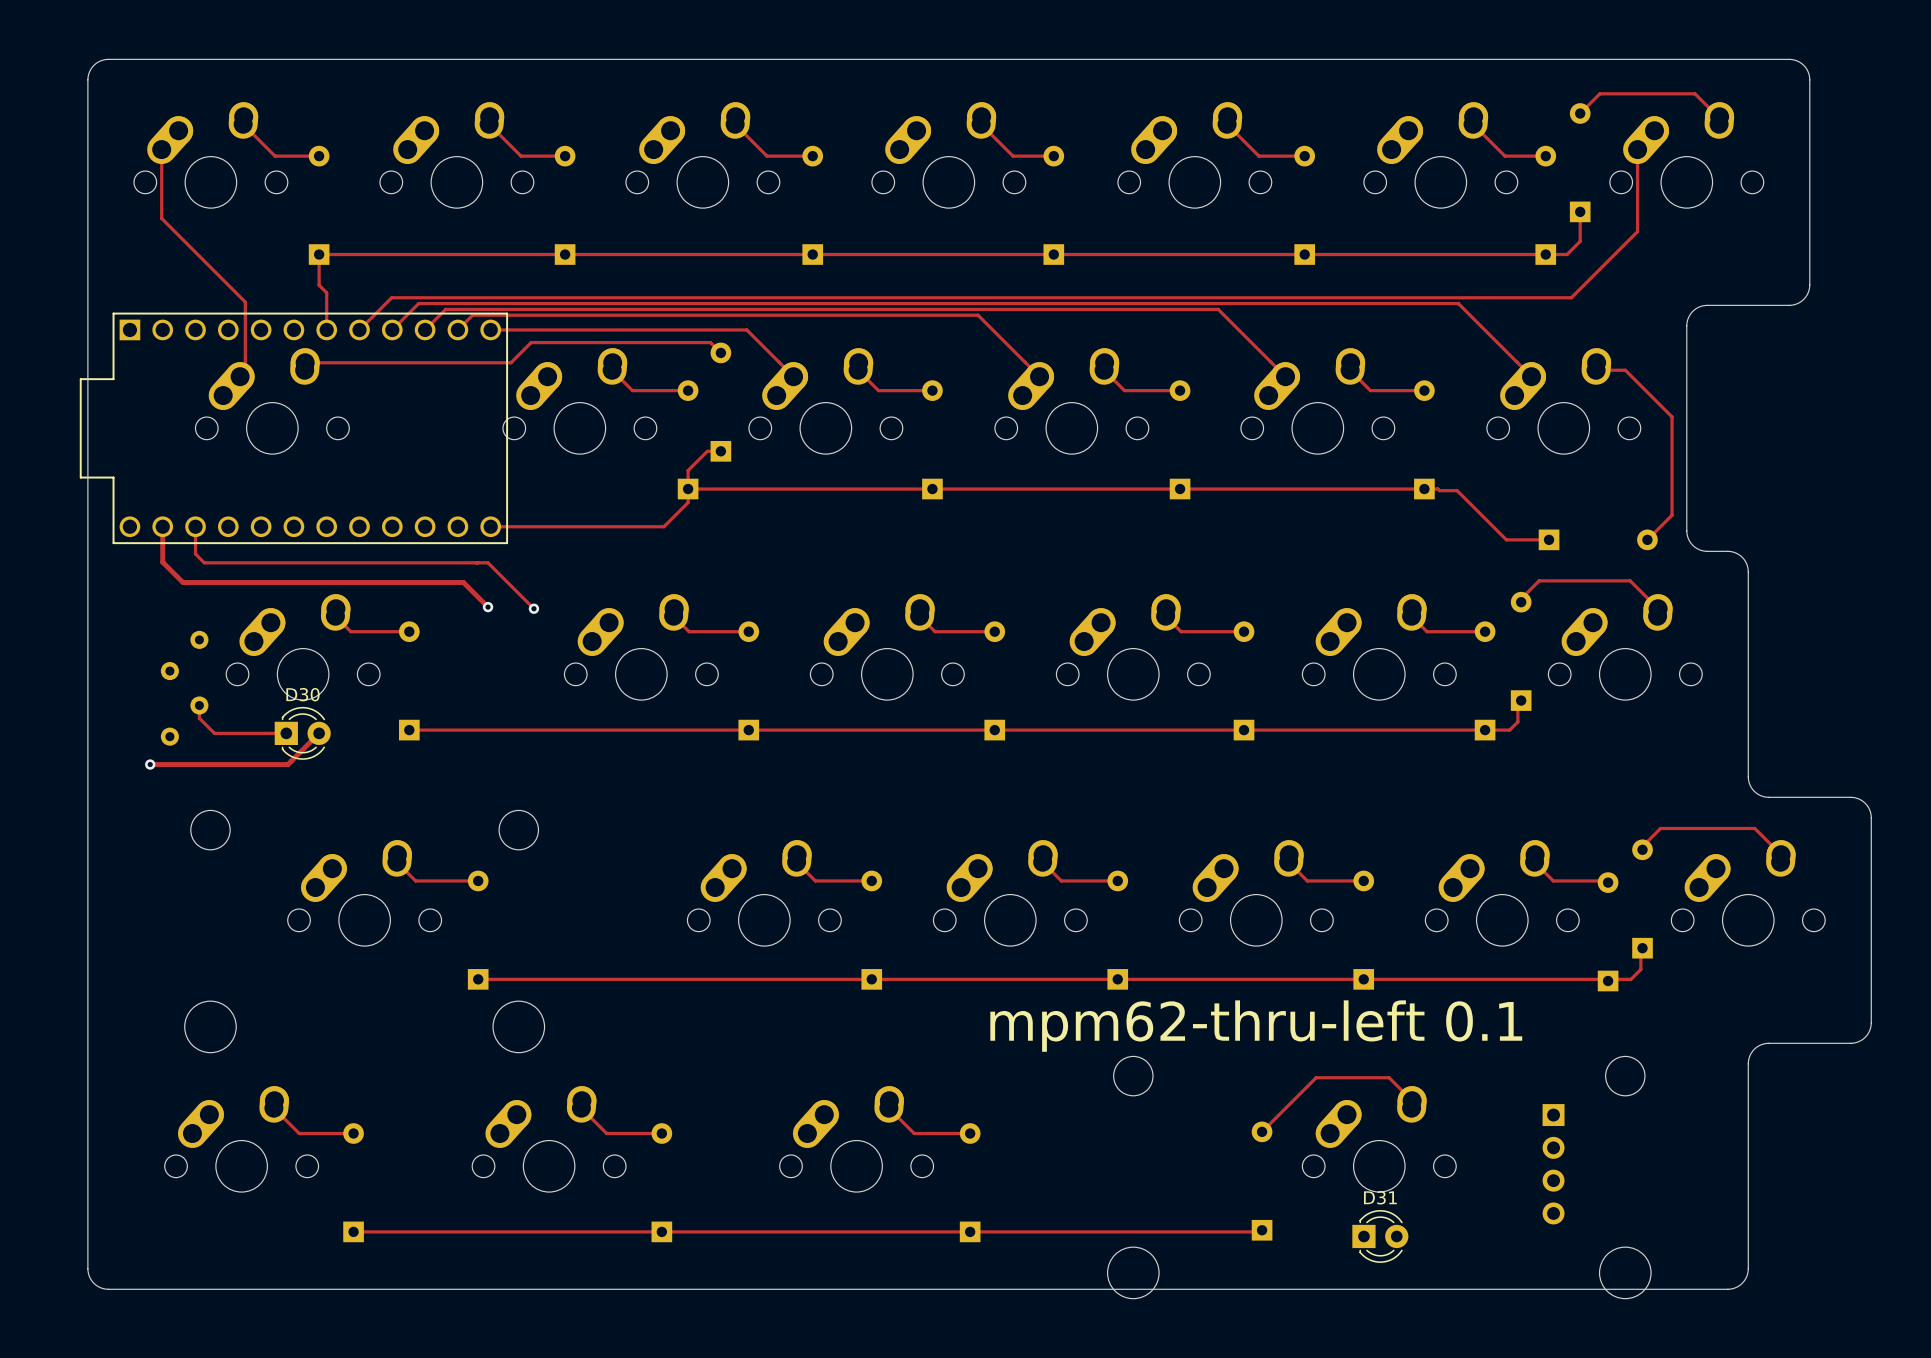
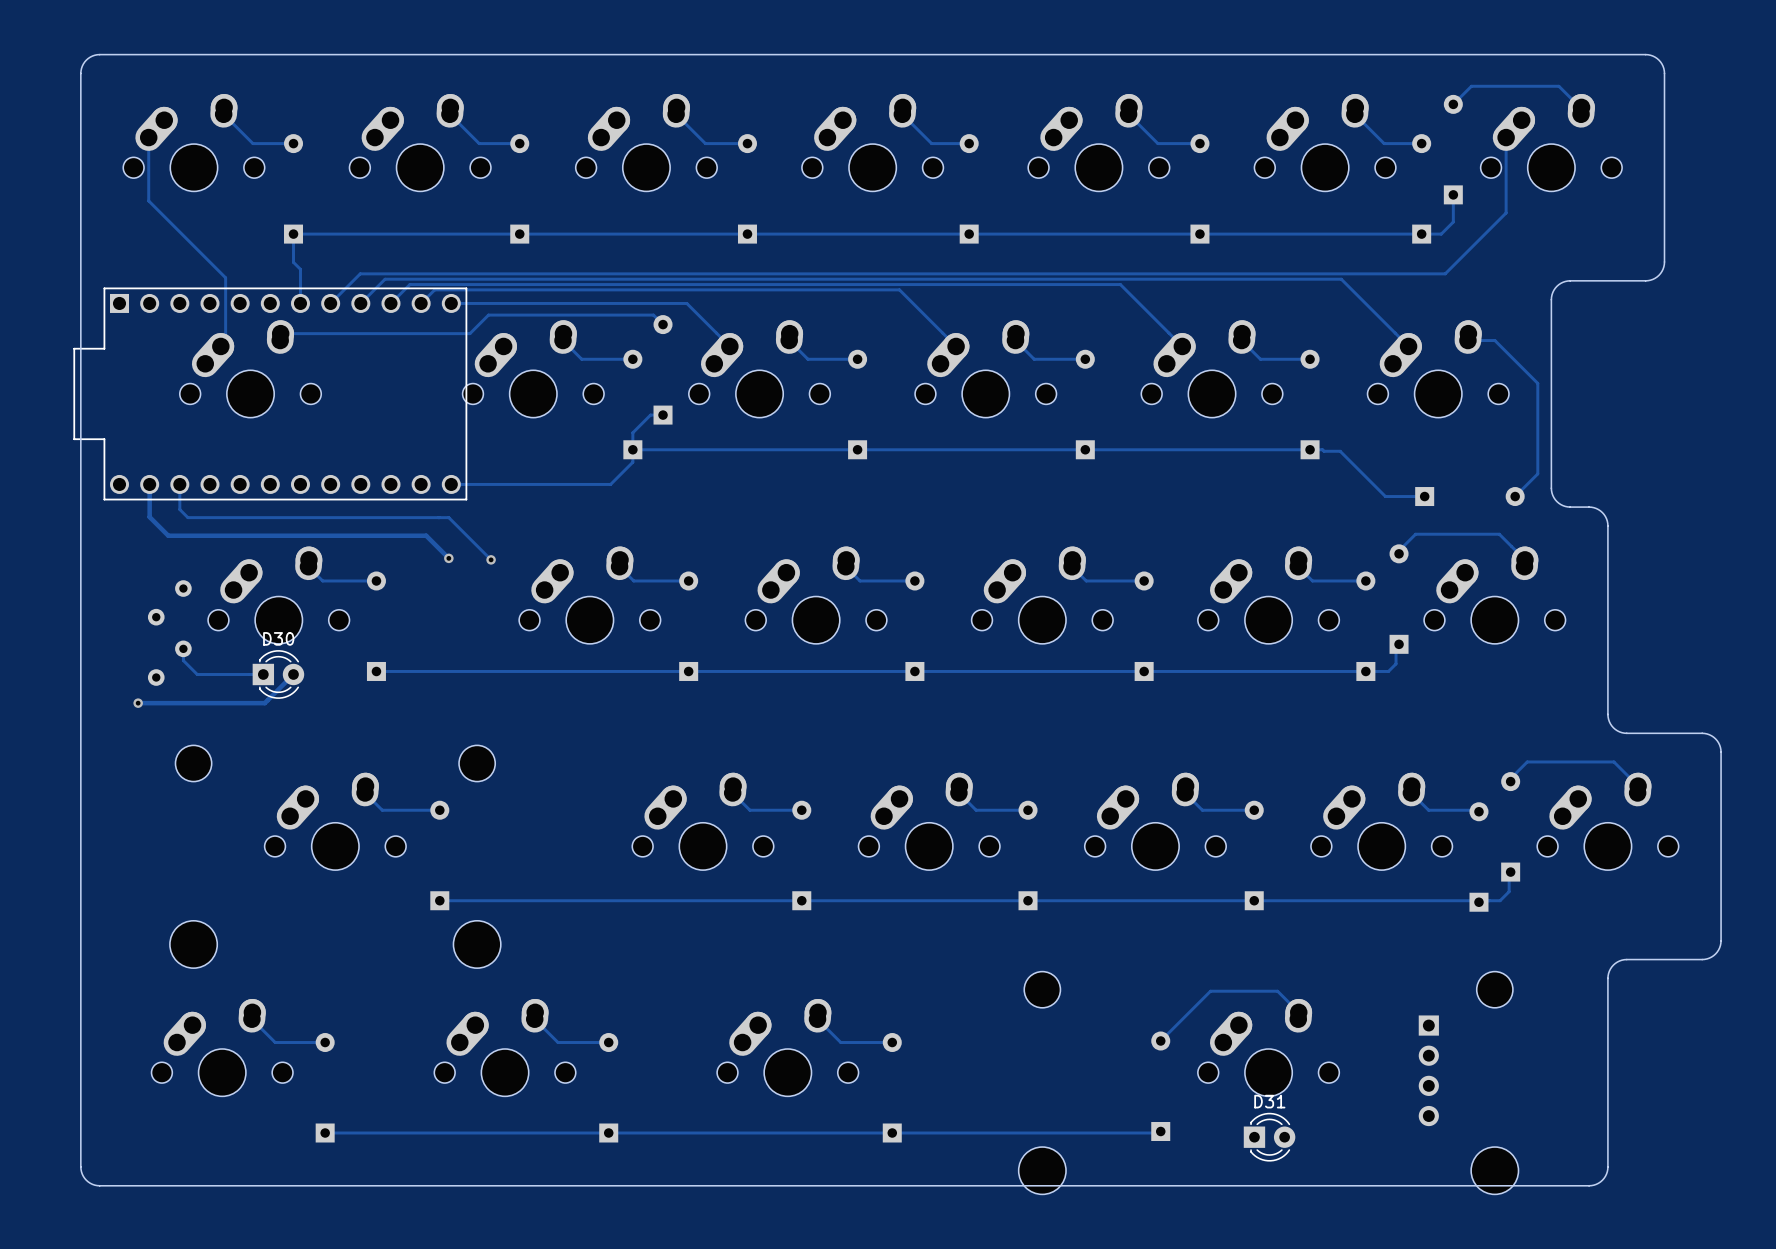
text: mpm62-thru-left 0.1 (1256, 1026) -> none

